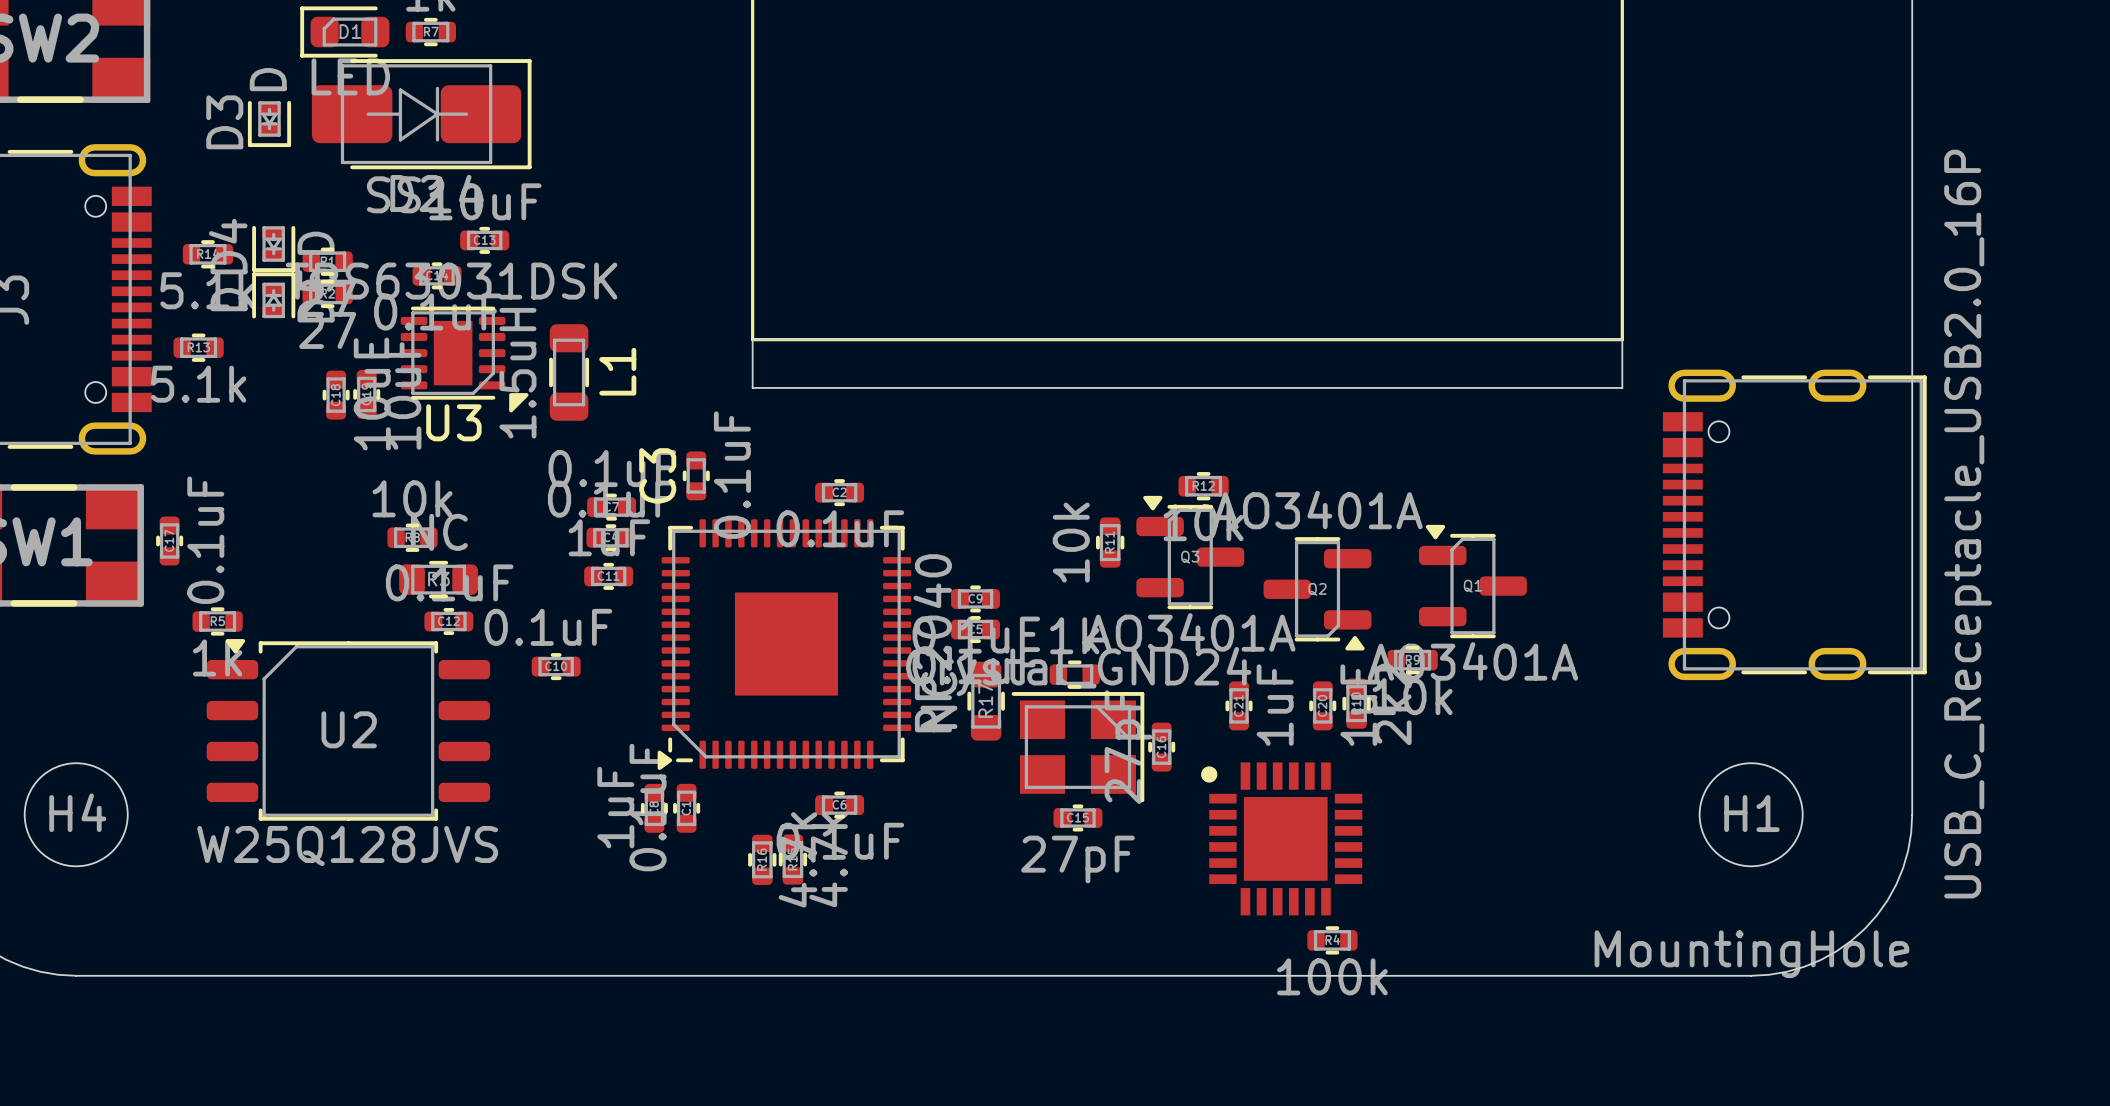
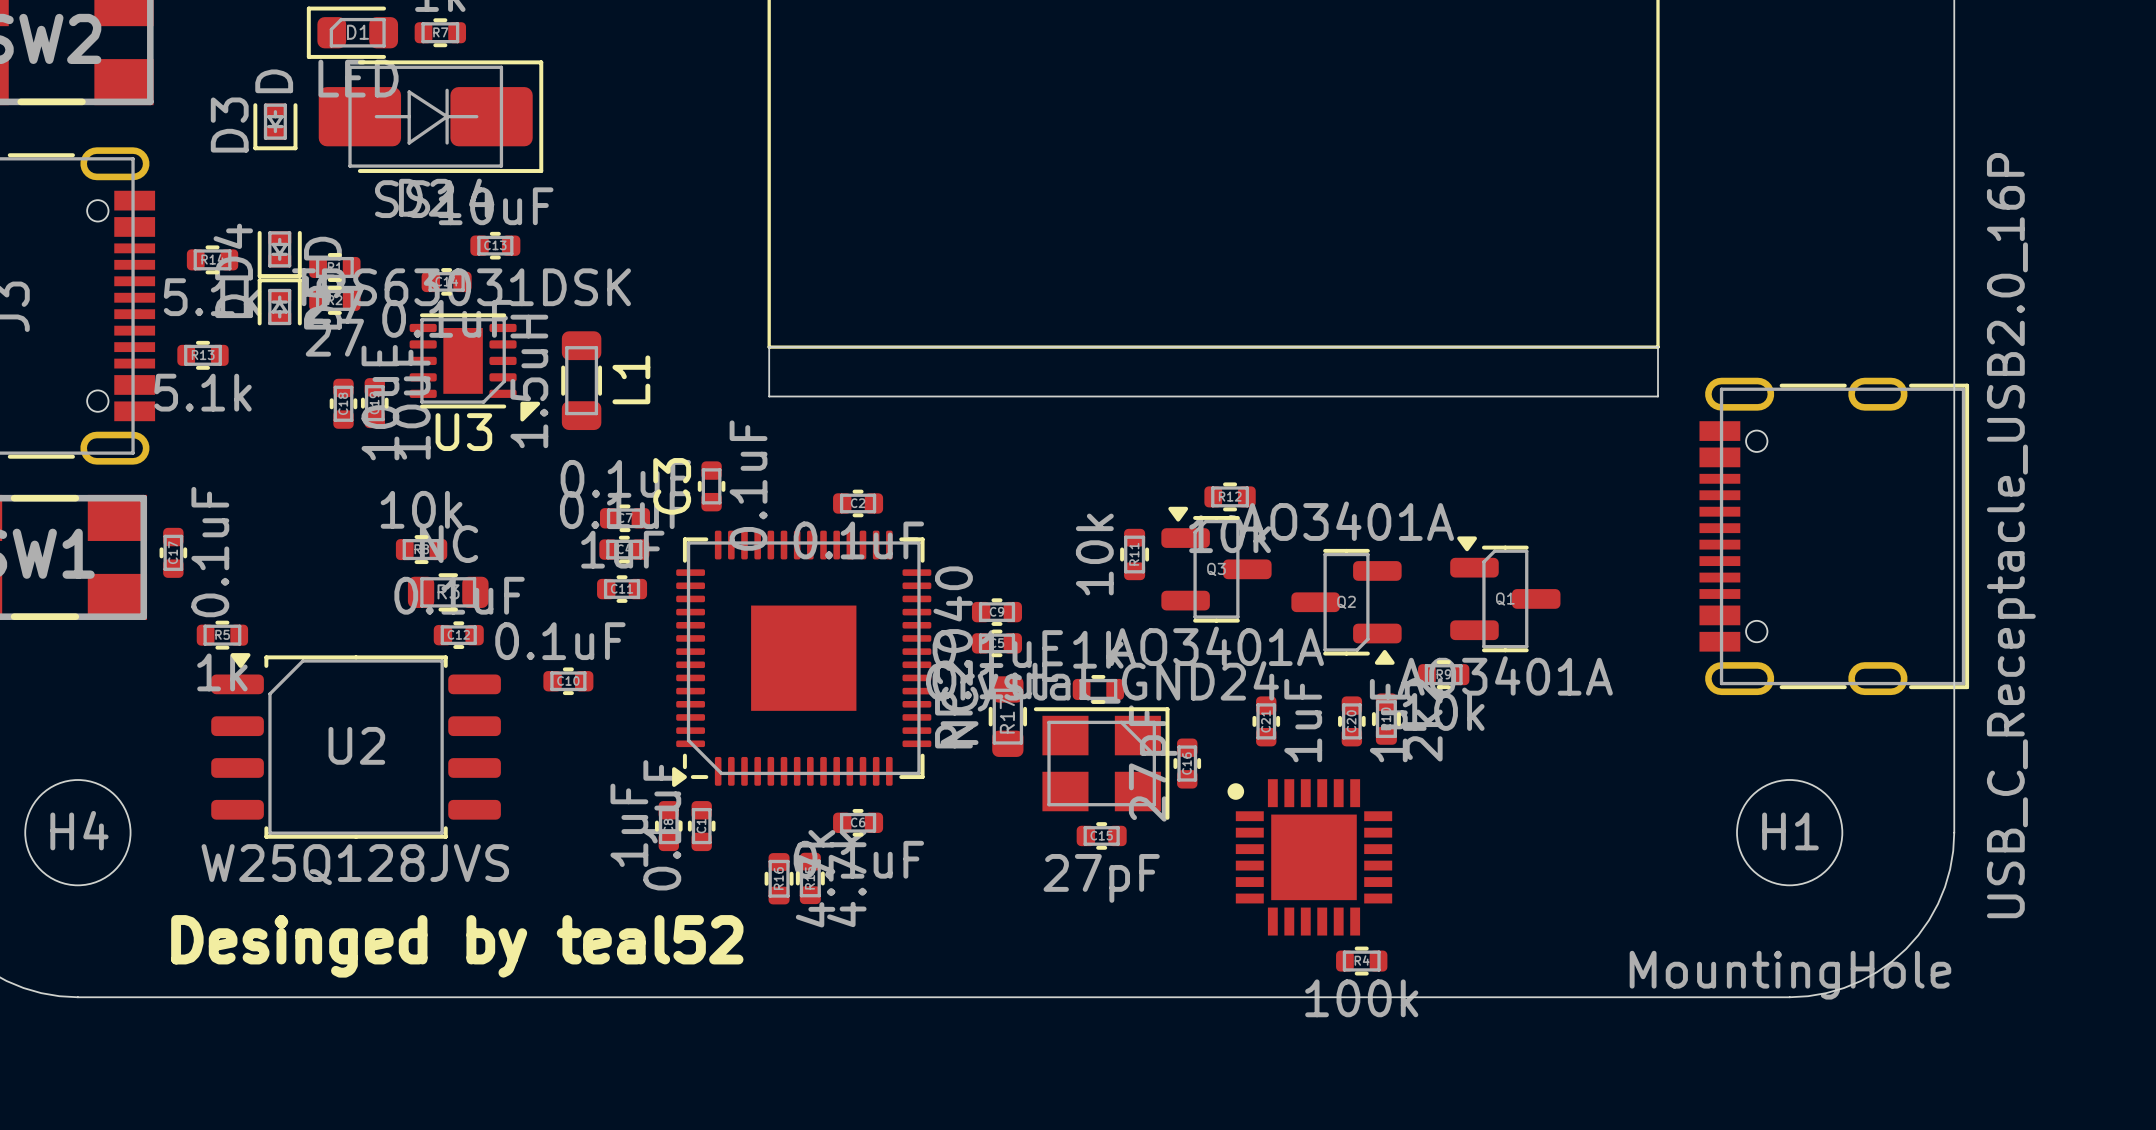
text: none -> Desinged by teal52 (457, 946)

